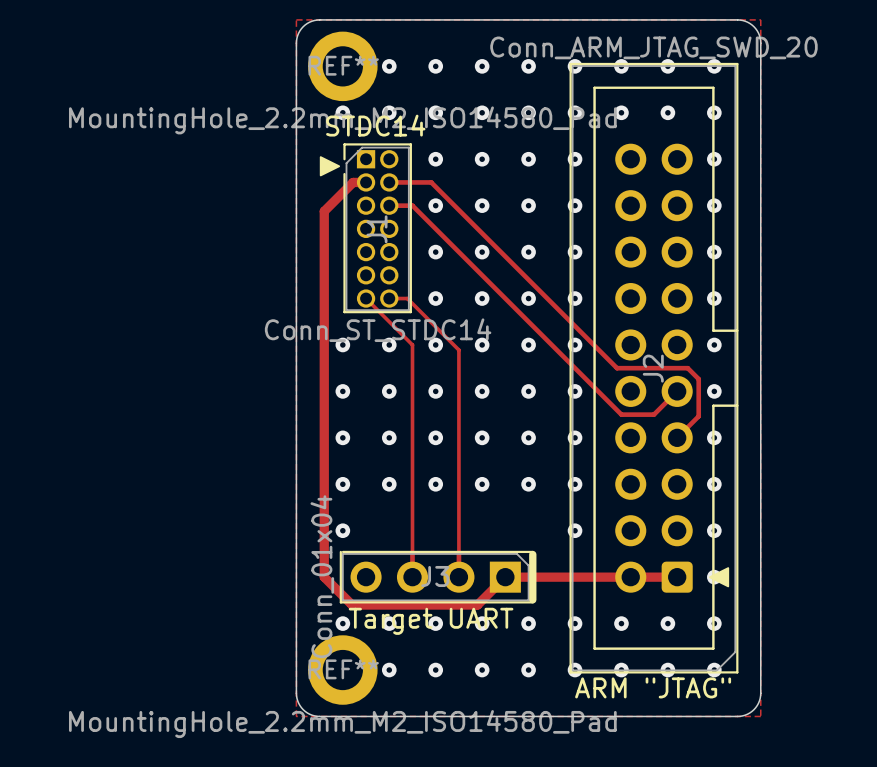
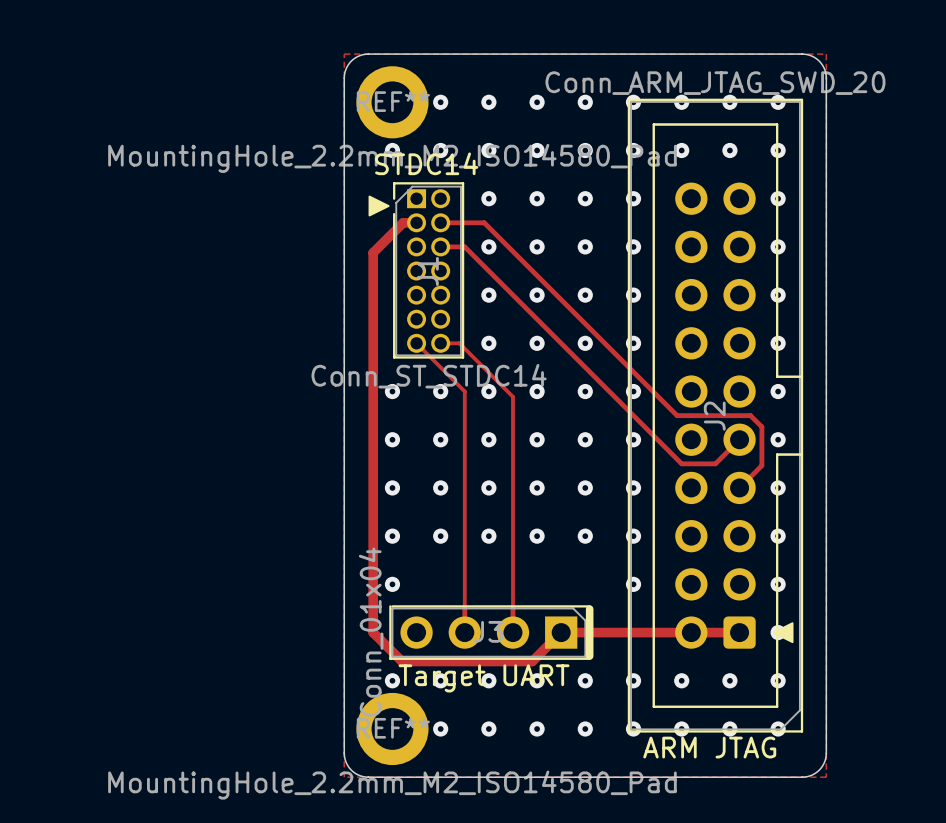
J2 text: ARM "JTAG" (653, 687) -> ARM JTAG (709, 747)

